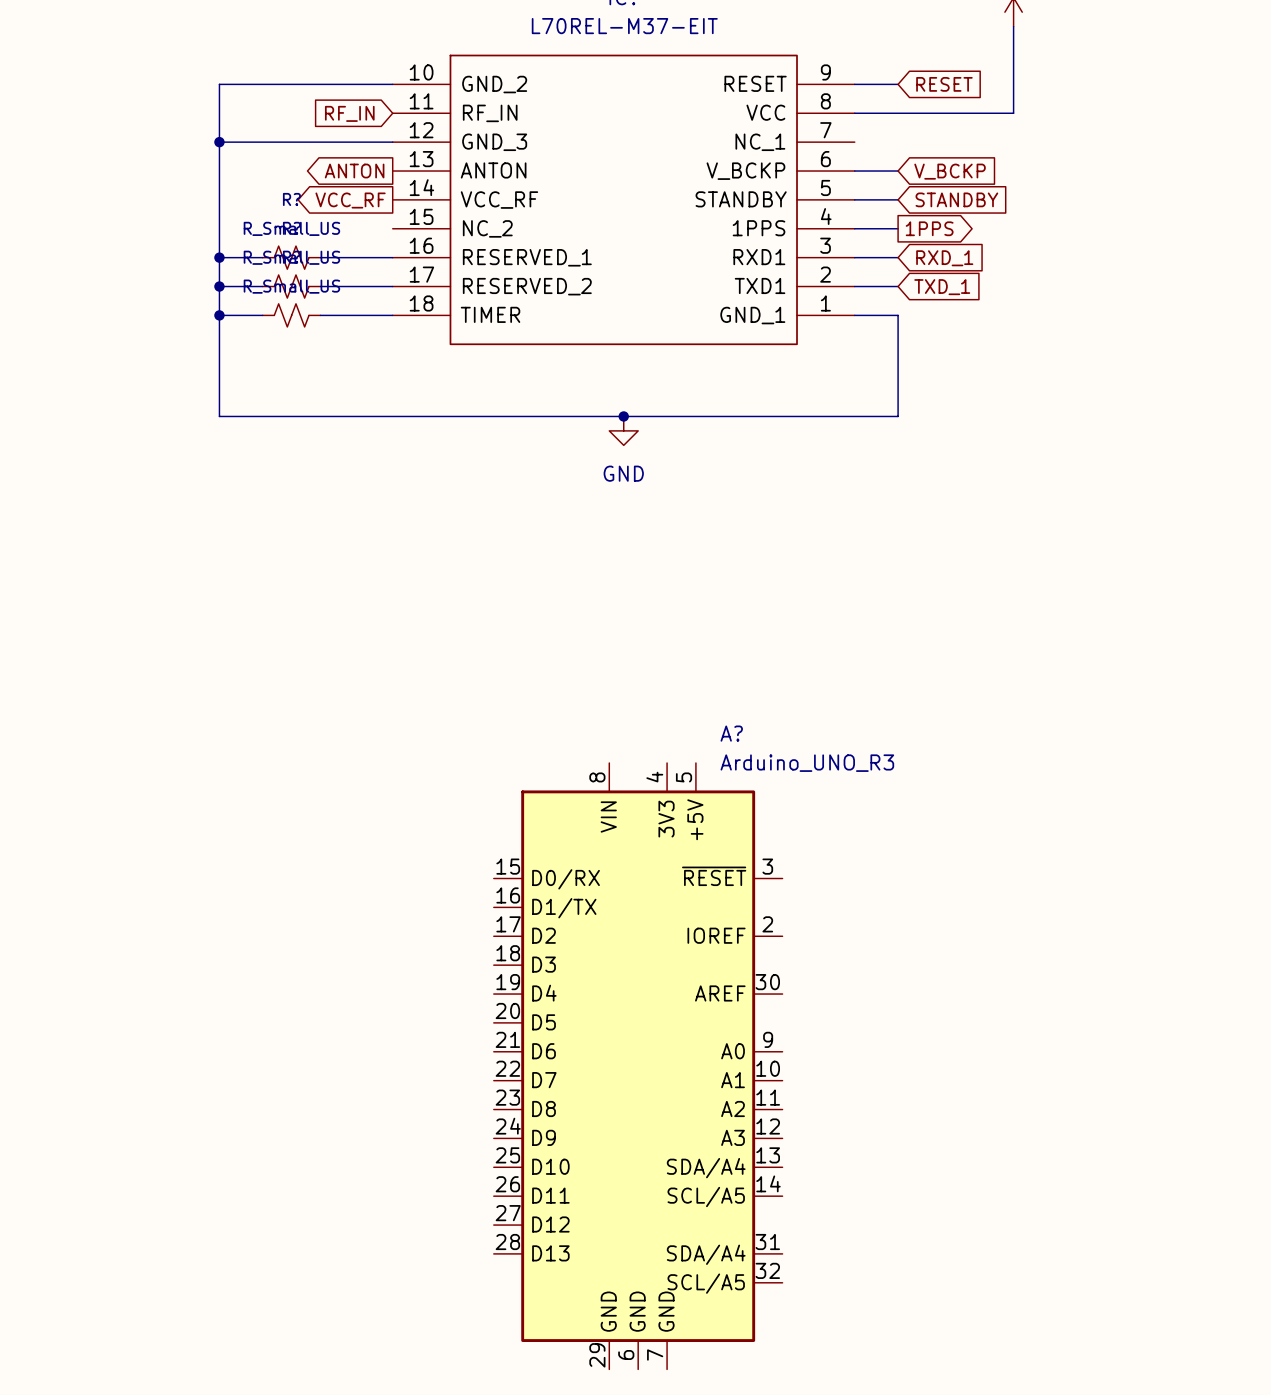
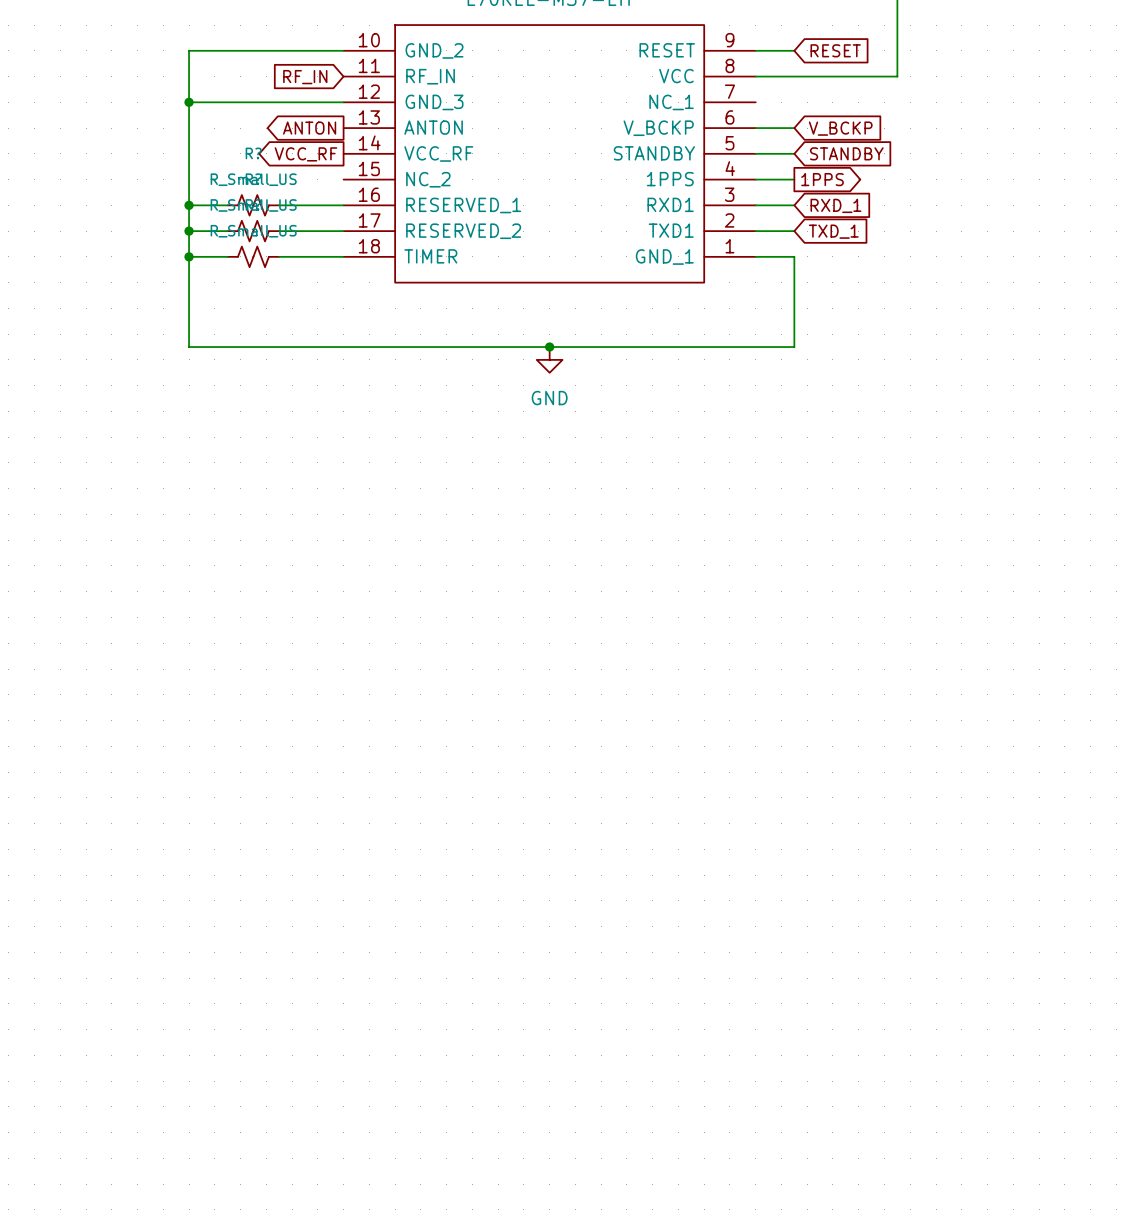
A?: Arduino_UNO_R3 (638, 1066) -> none

